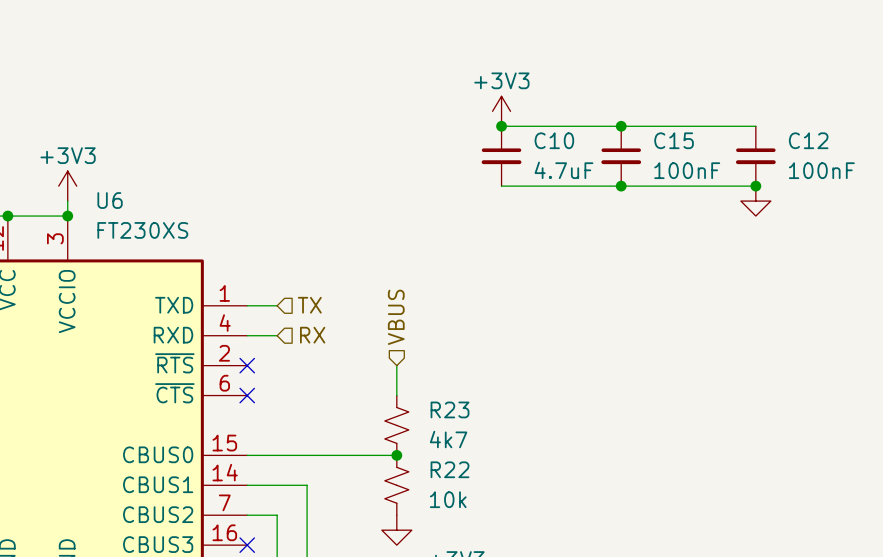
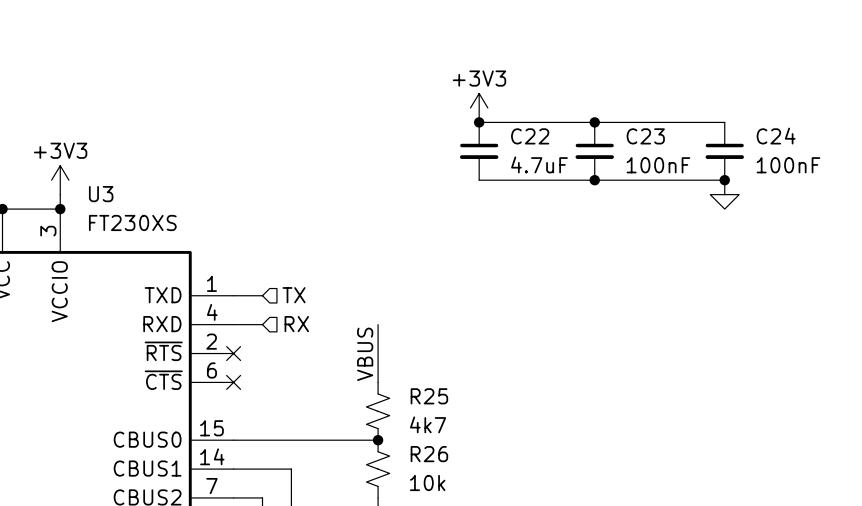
C10 name: C10 (554, 140) -> C22 (530, 136)
C15 name: C15 (674, 140) -> C23 (645, 136)
C12 name: C12 (808, 140) -> C24 (776, 136)
U6 name: U6 (110, 200) -> U3 (101, 194)
hierarchical label: VBUS (396, 317) -> none
wire: none -> (378, 324) (378, 353)
label: none -> VBUS (365, 354)
R23 name: R23 (450, 409) -> R25 (429, 396)
R22 name: R22 (450, 469) -> R26 (429, 454)

